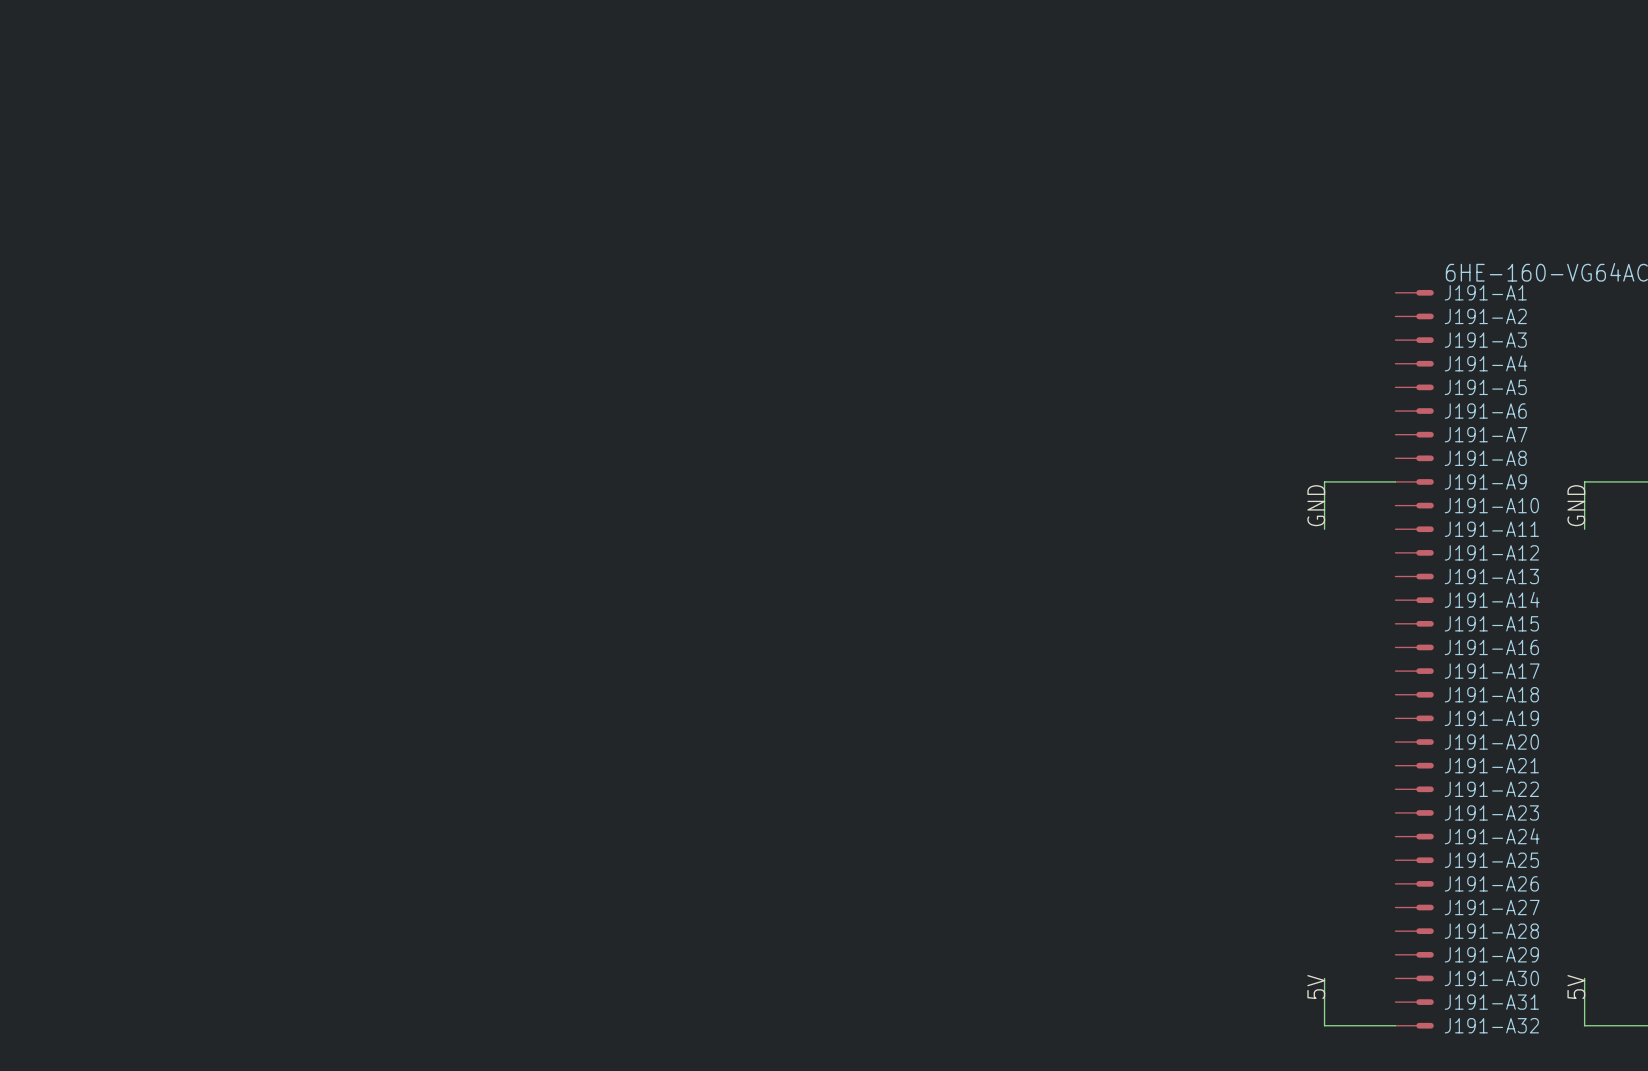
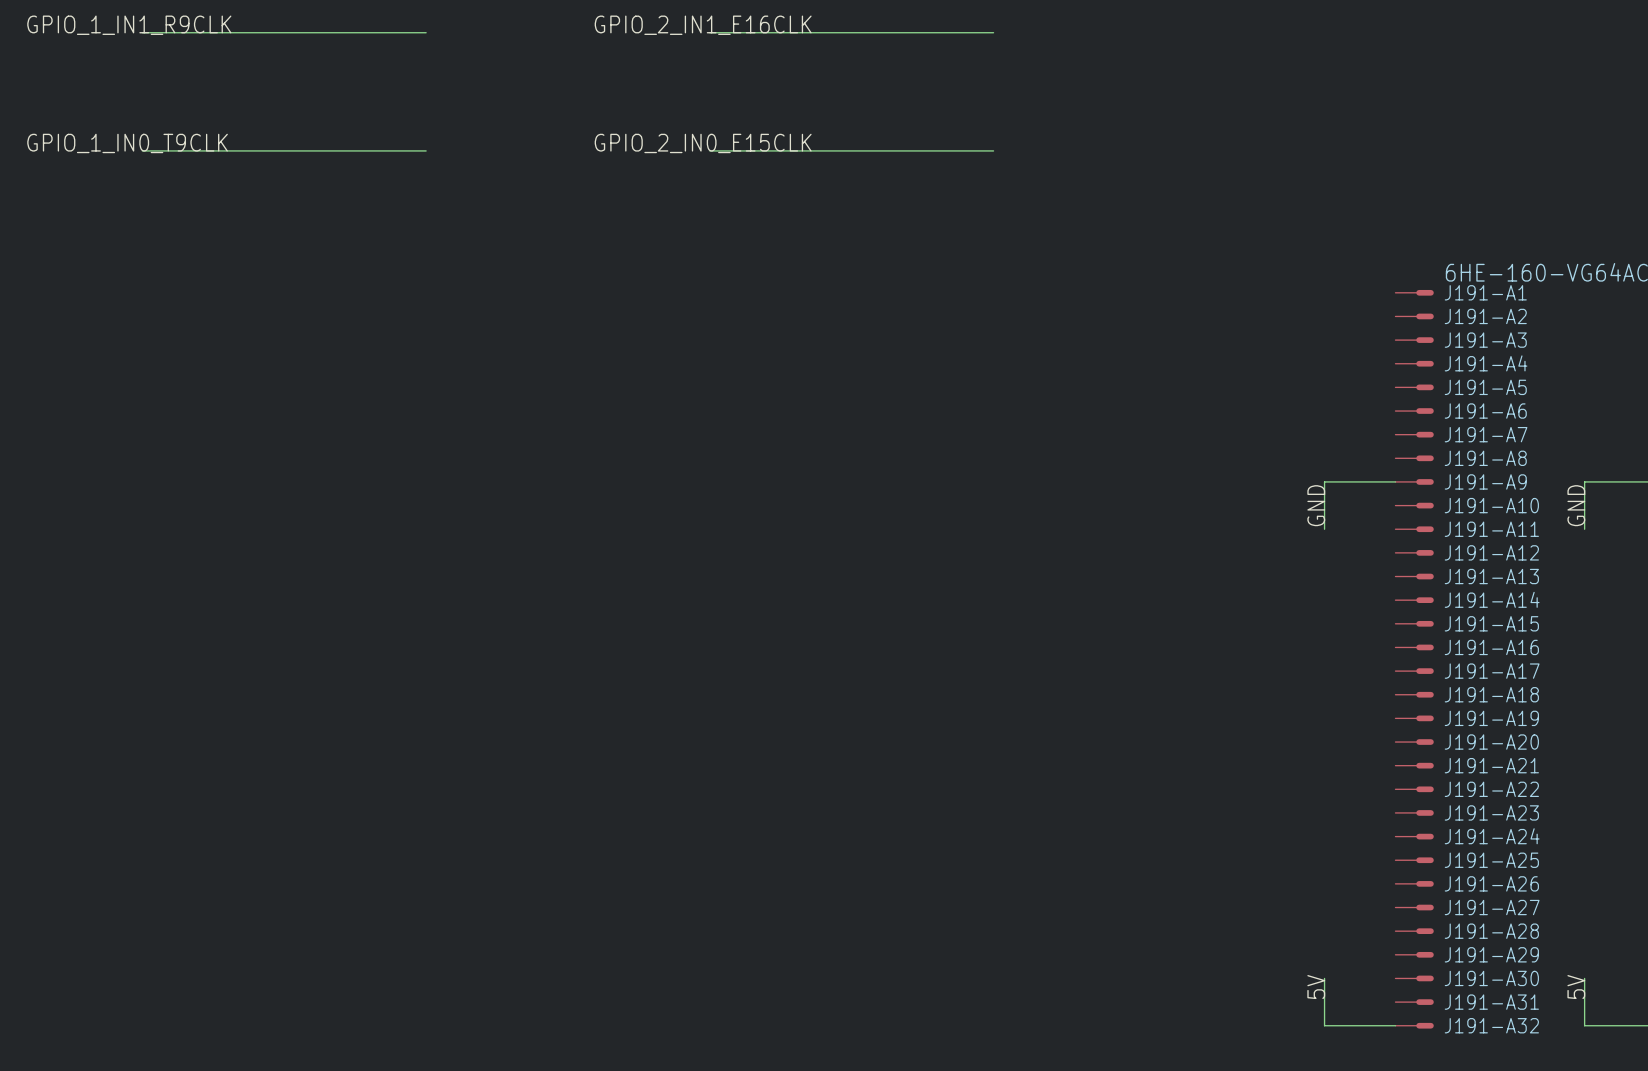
label: none -> GPIO_1_IN1_R9CLK (129, 25)
label: none -> GPIO_2_IN1_E16CLK (703, 25)
wire: none -> (142, 32) (426, 32)
wire: none -> (709, 32) (993, 32)
label: none -> GPIO_1_IN0_T9CLK (127, 143)
label: none -> GPIO_2_IN0_E15CLK (703, 143)
wire: none -> (142, 150) (426, 150)
wire: none -> (709, 150) (993, 150)

